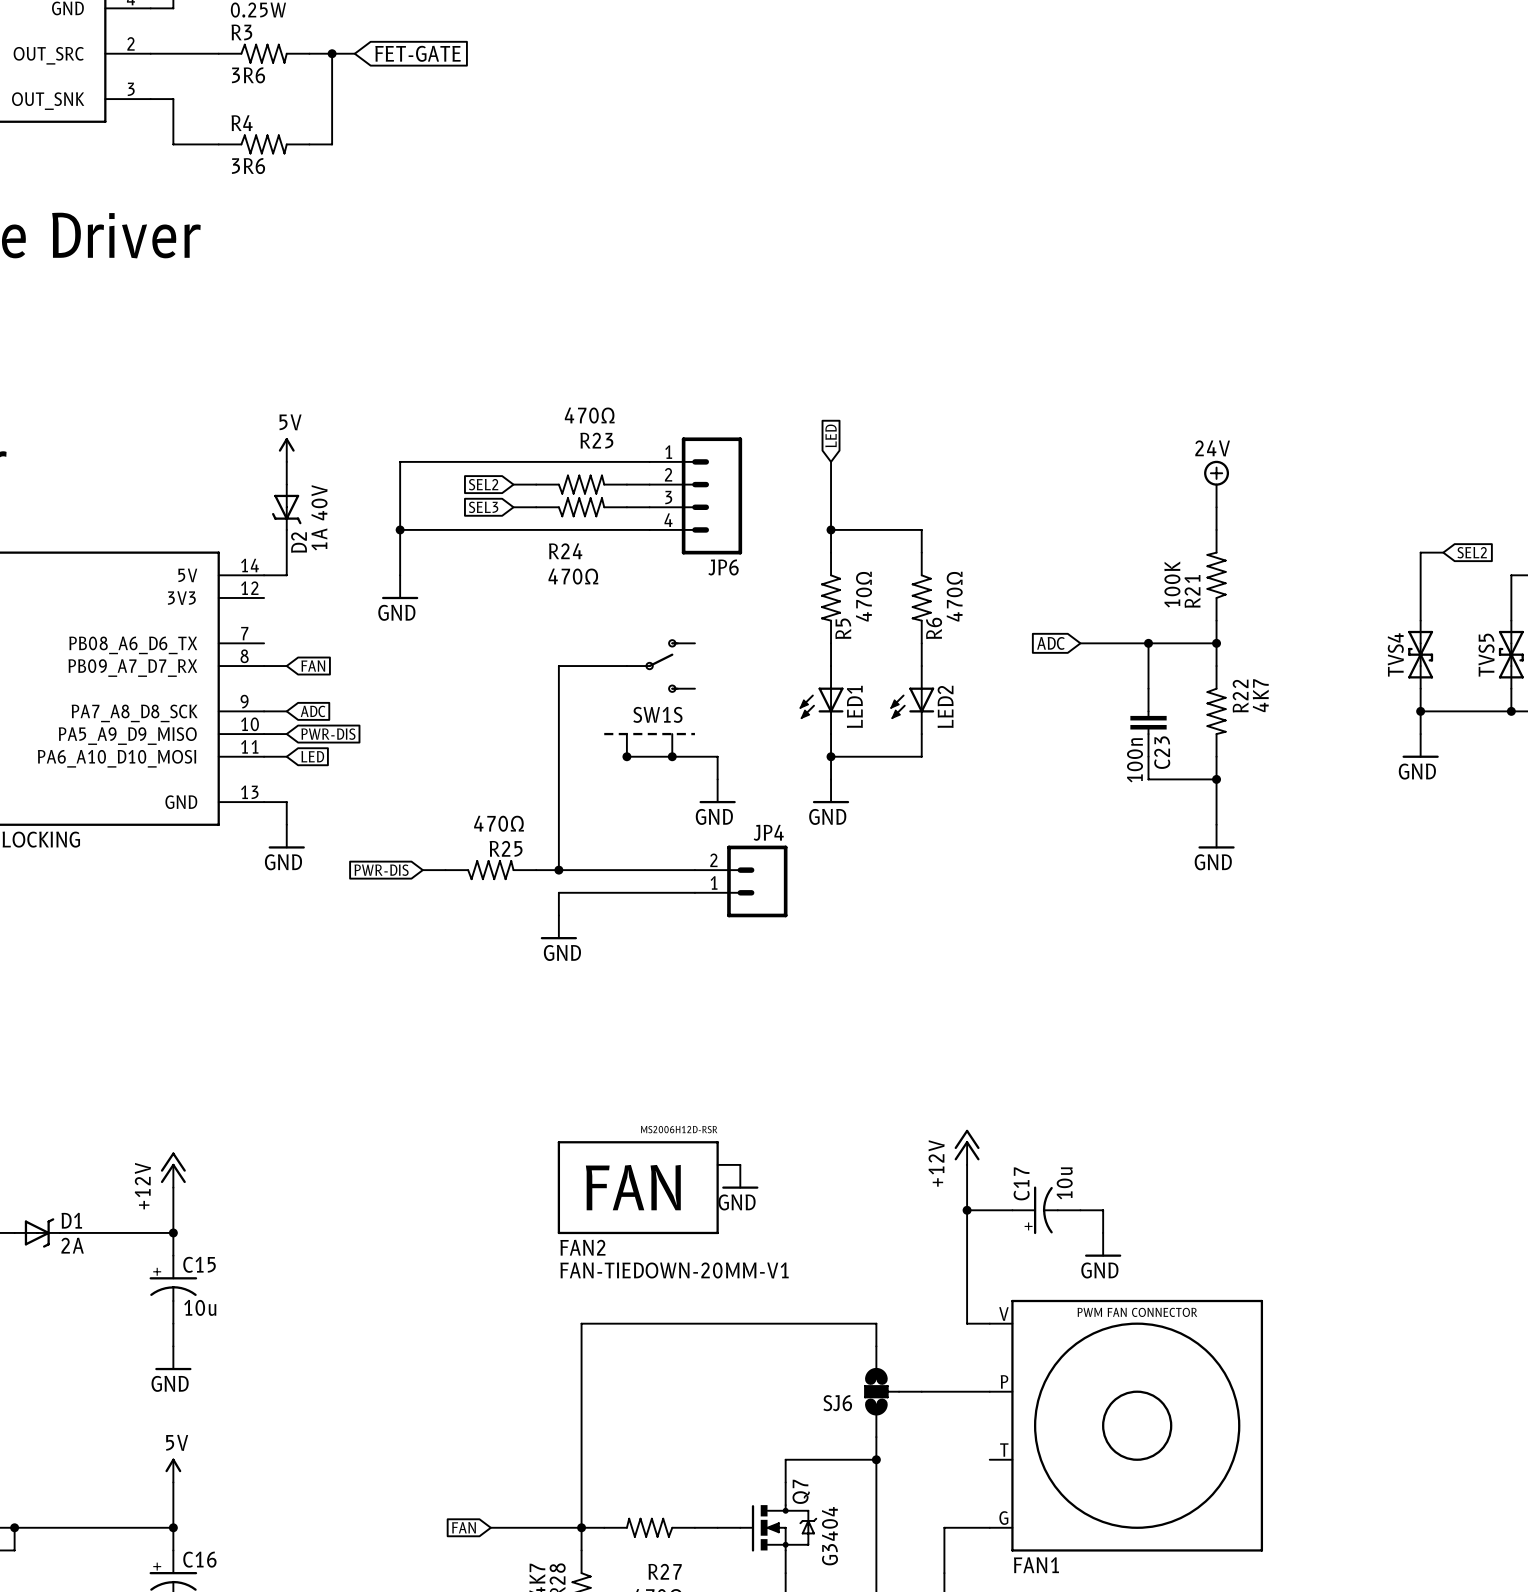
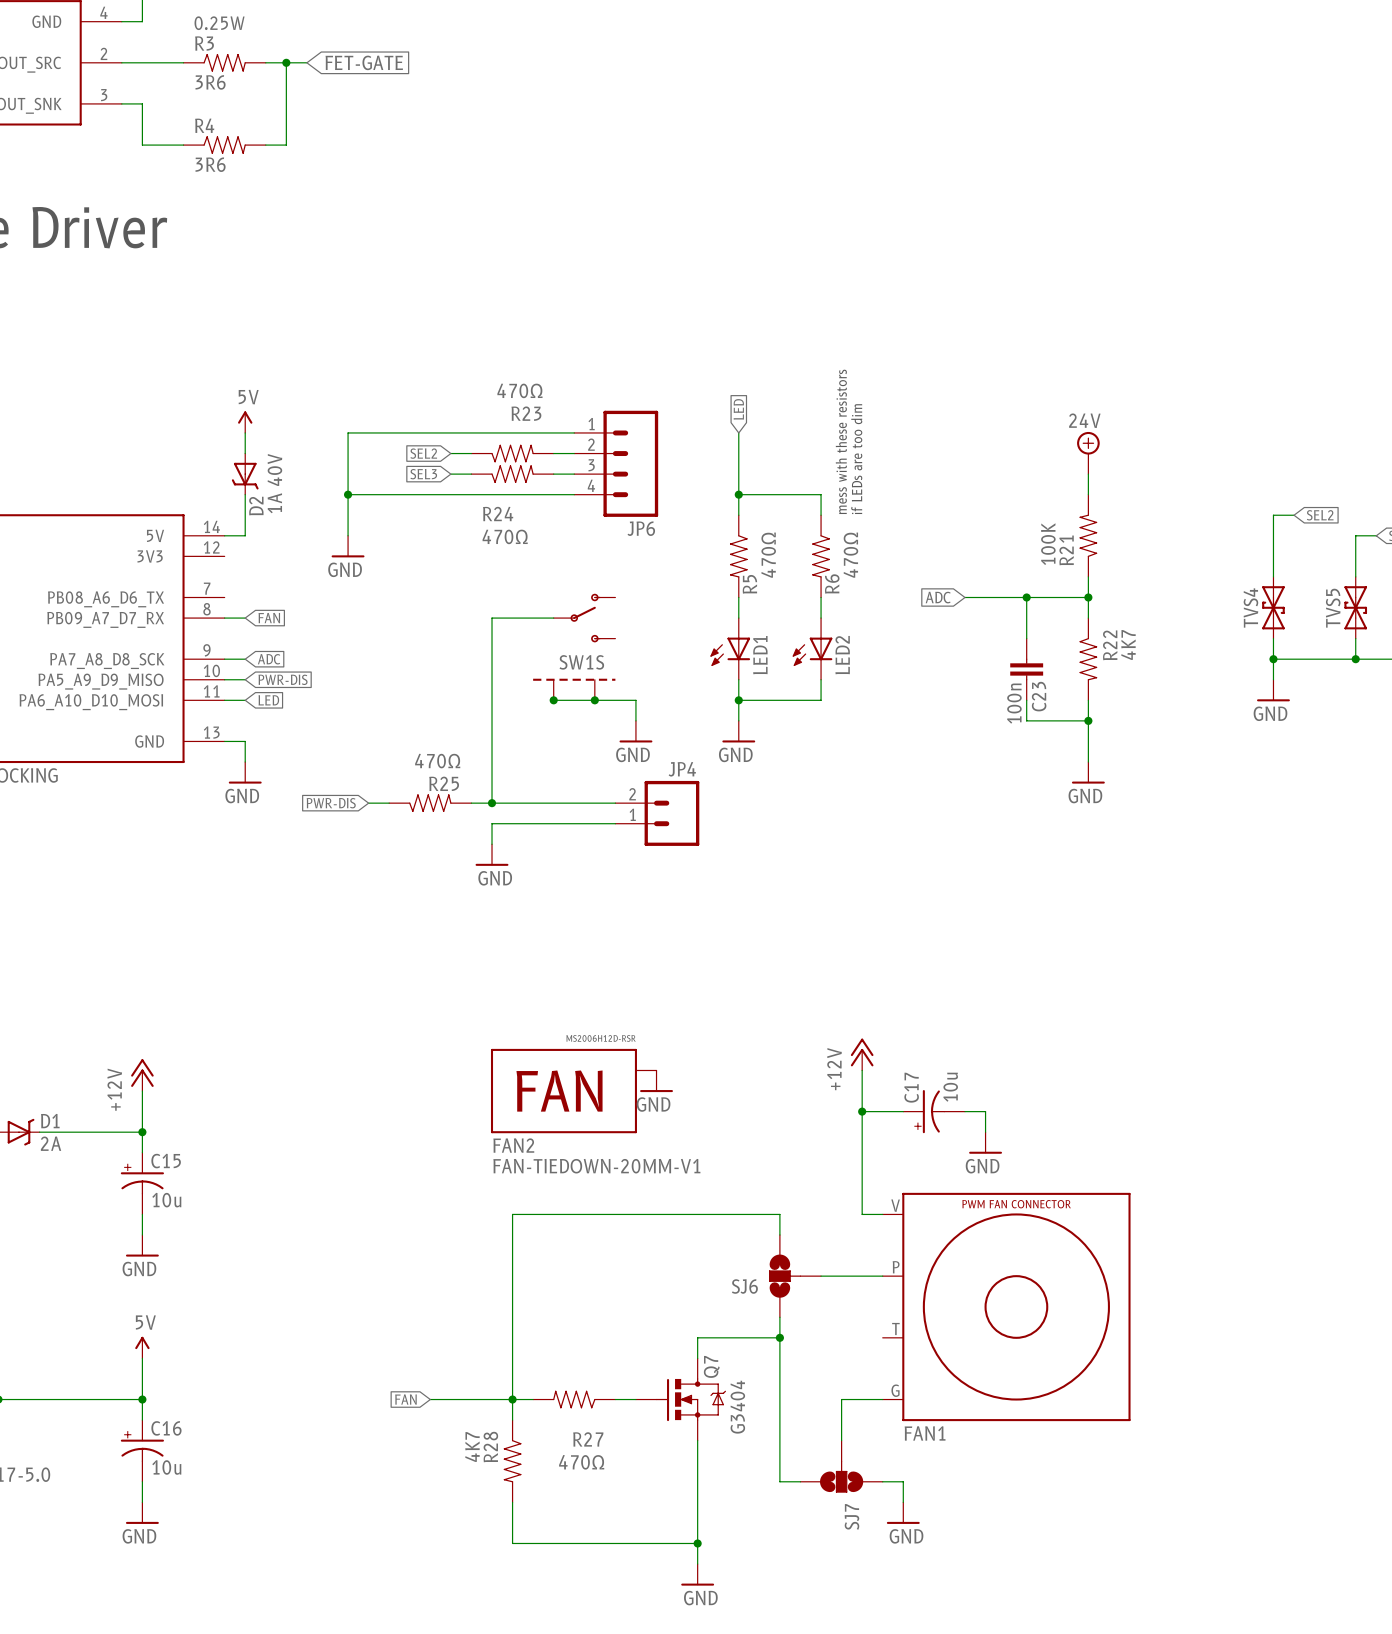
text: none -> mess with these resistors (841, 441)
text: none -> if LEDs are too dim (856, 459)

